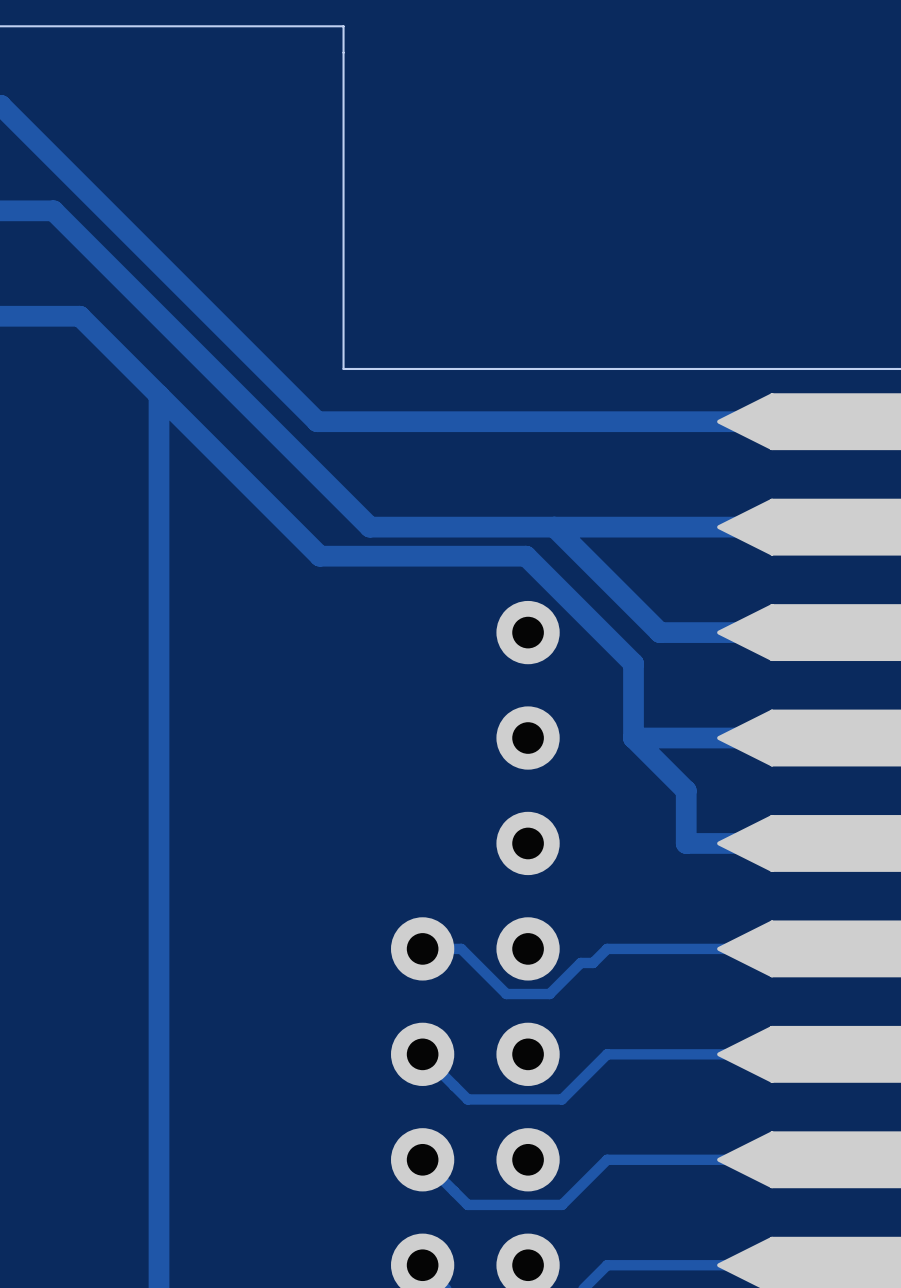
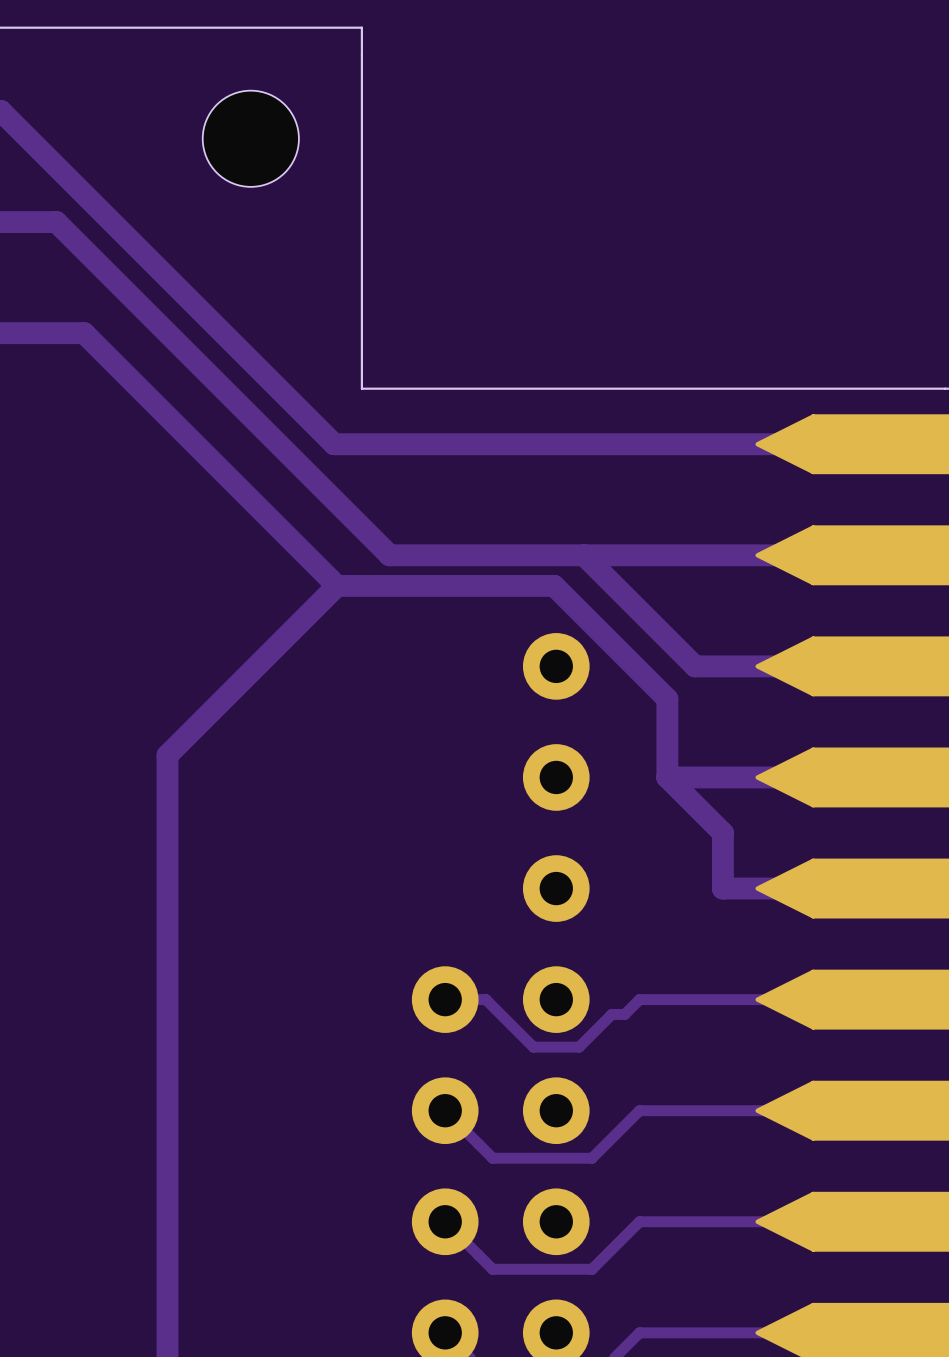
part: none -> (250, 138)
track: (159, 395) (159, 717) -> (336, 585) (167, 755)

